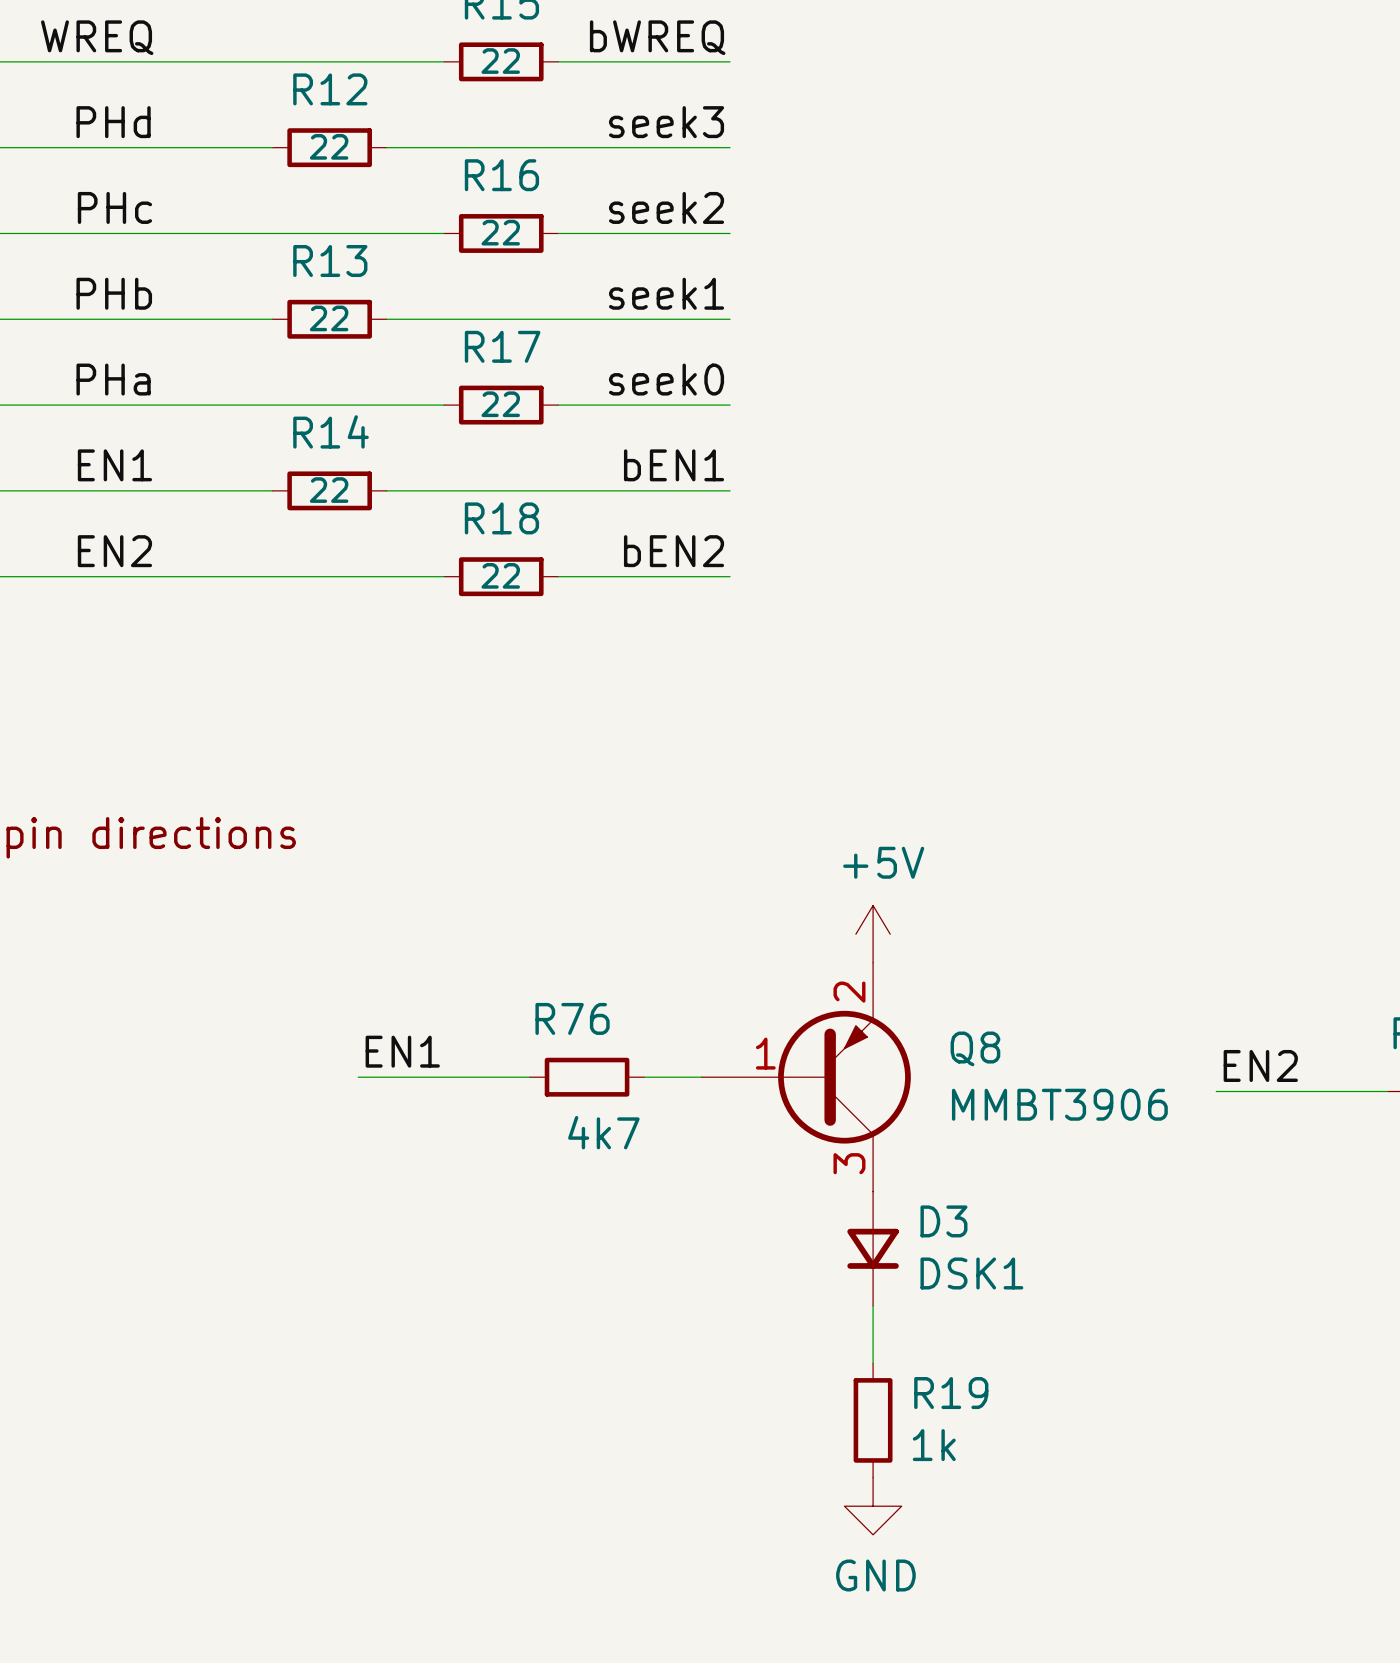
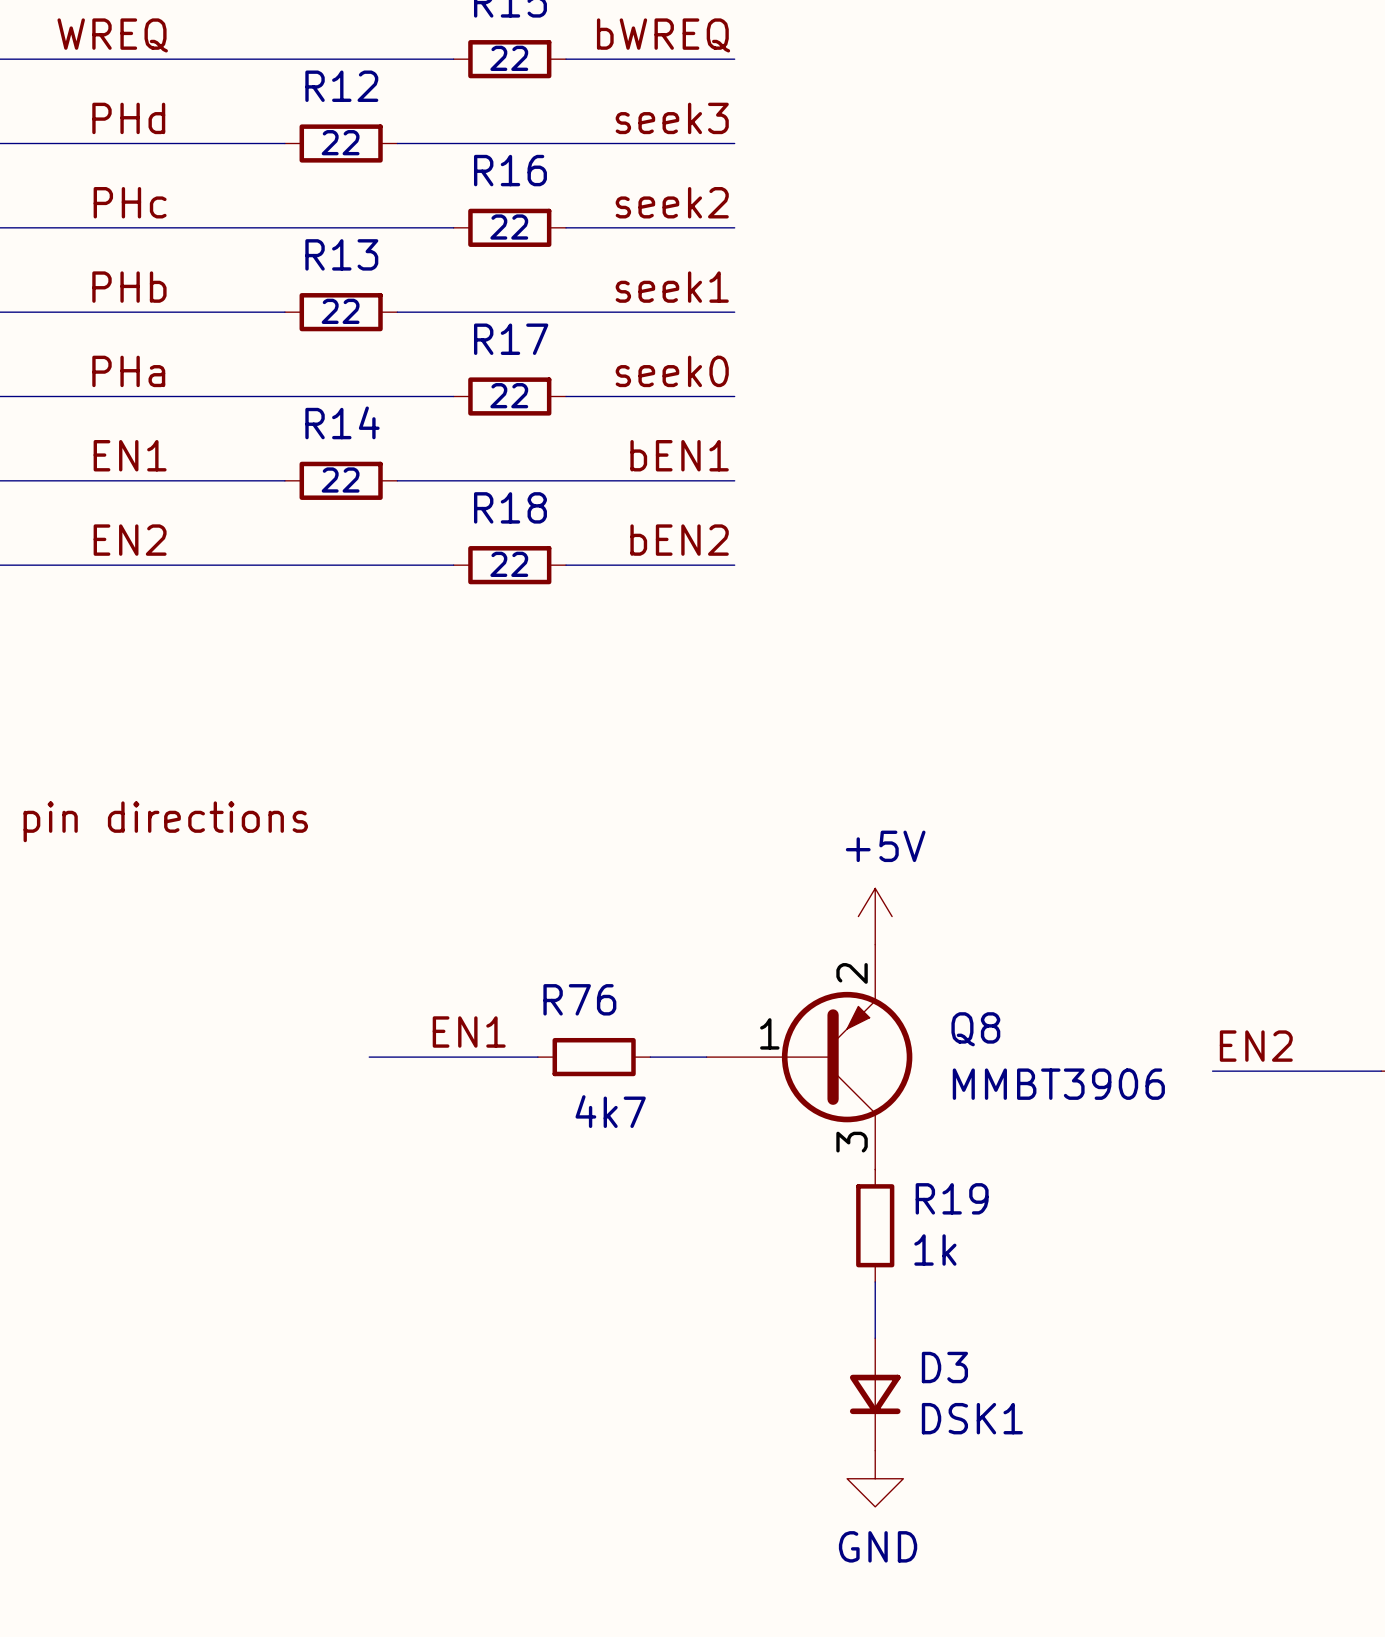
label position: EN1 (402, 1051) -> EN1 (469, 1032)
D3 position: (873, 1248) -> (875, 1394)
R19 position: (873, 1420) -> (875, 1225)

